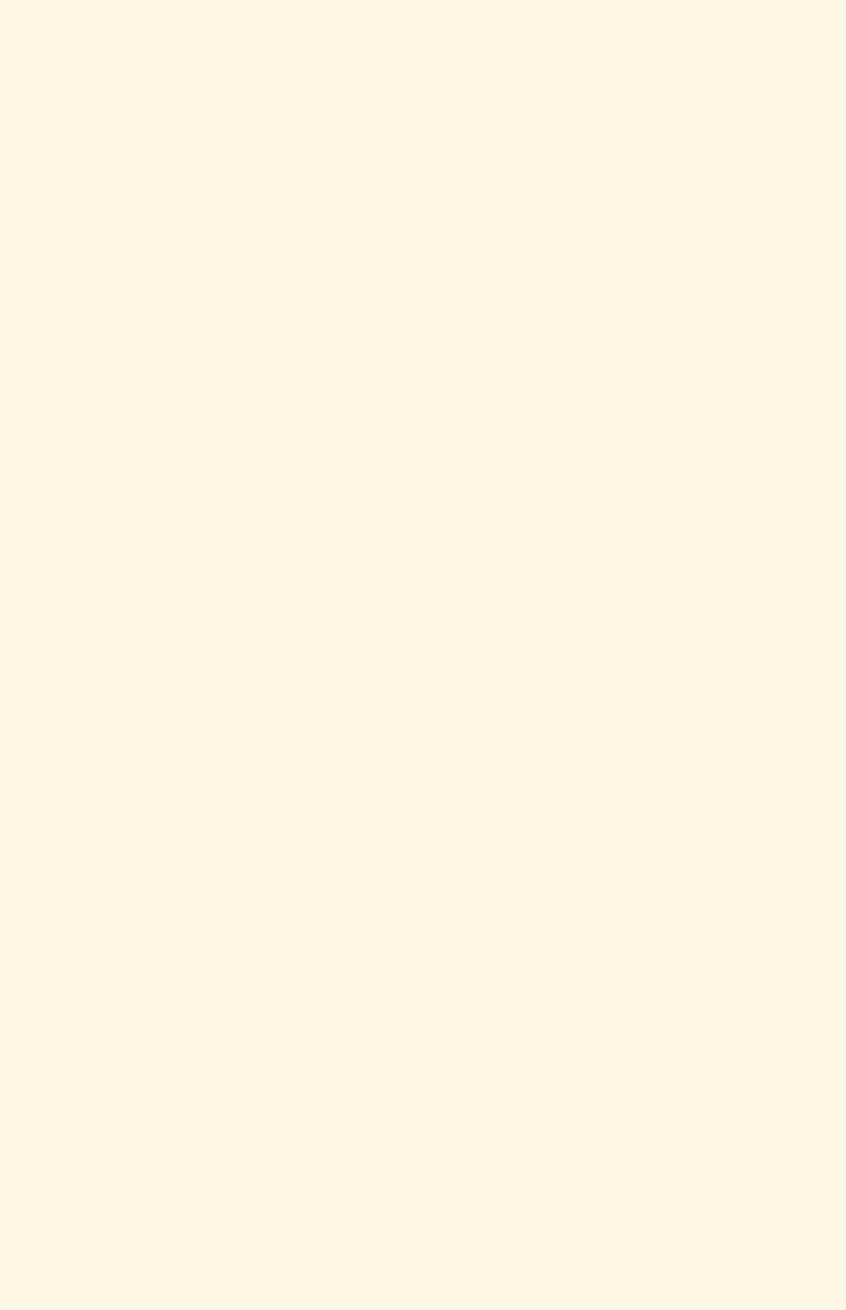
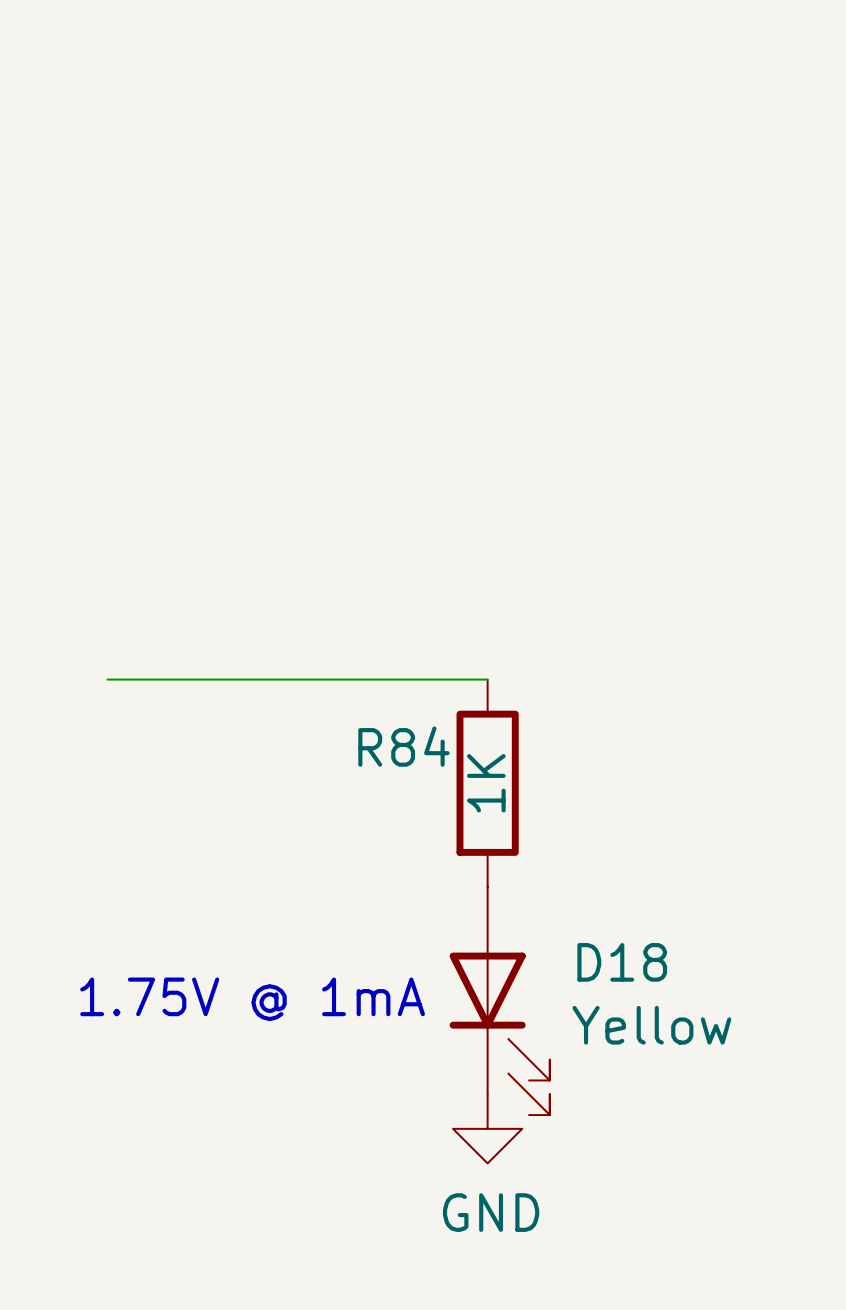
wire: none -> (107, 679) (487, 679)
R84: none -> 1K (487, 783)
text: none -> 1.75V @ 1mA (252, 999)
D18: none -> Yellow (499, 1000)
power symbol: none -> GND (487, 1128)

